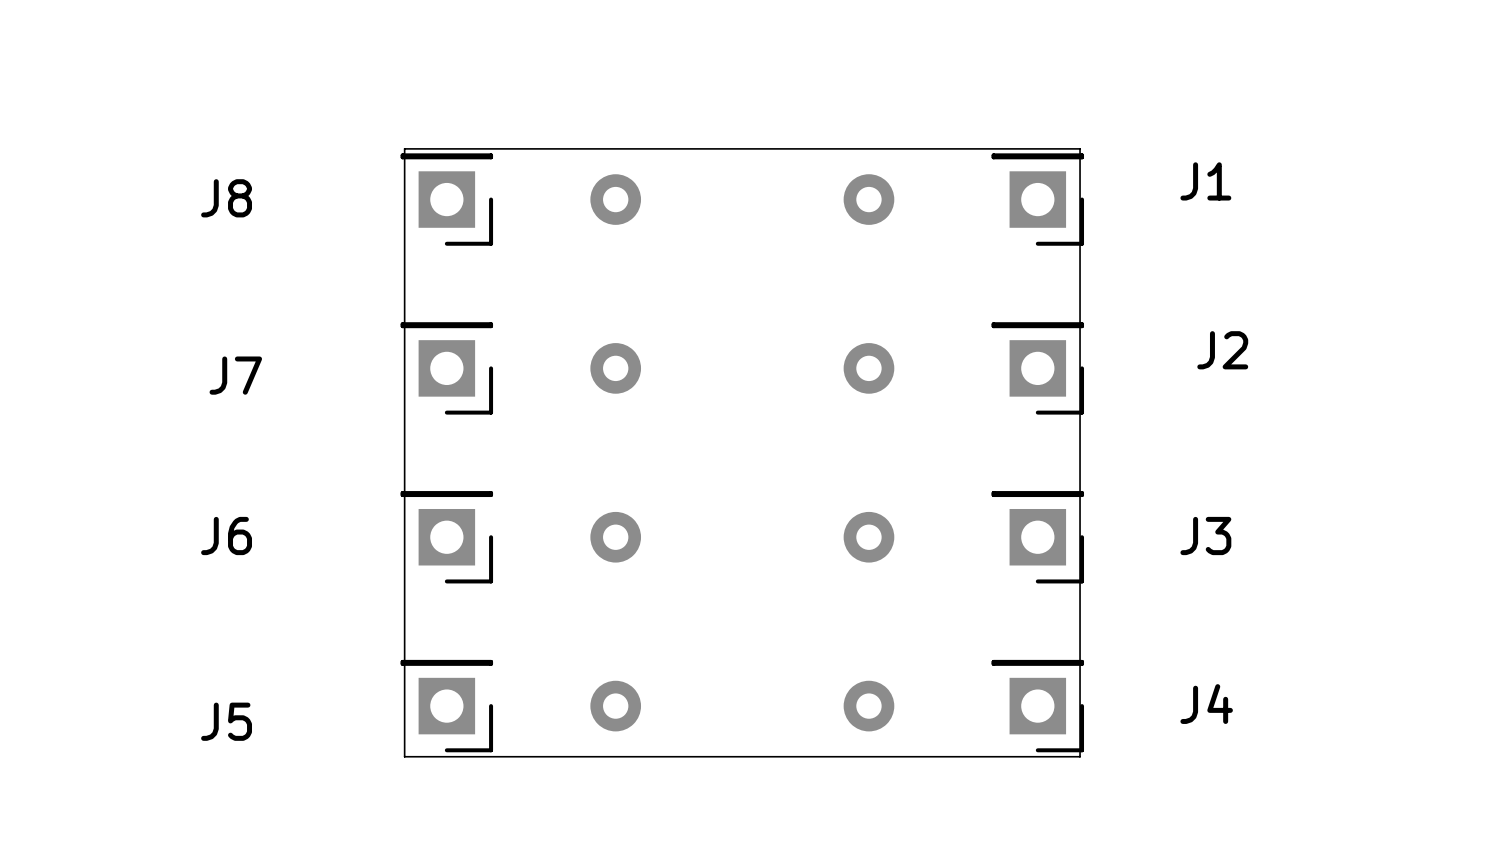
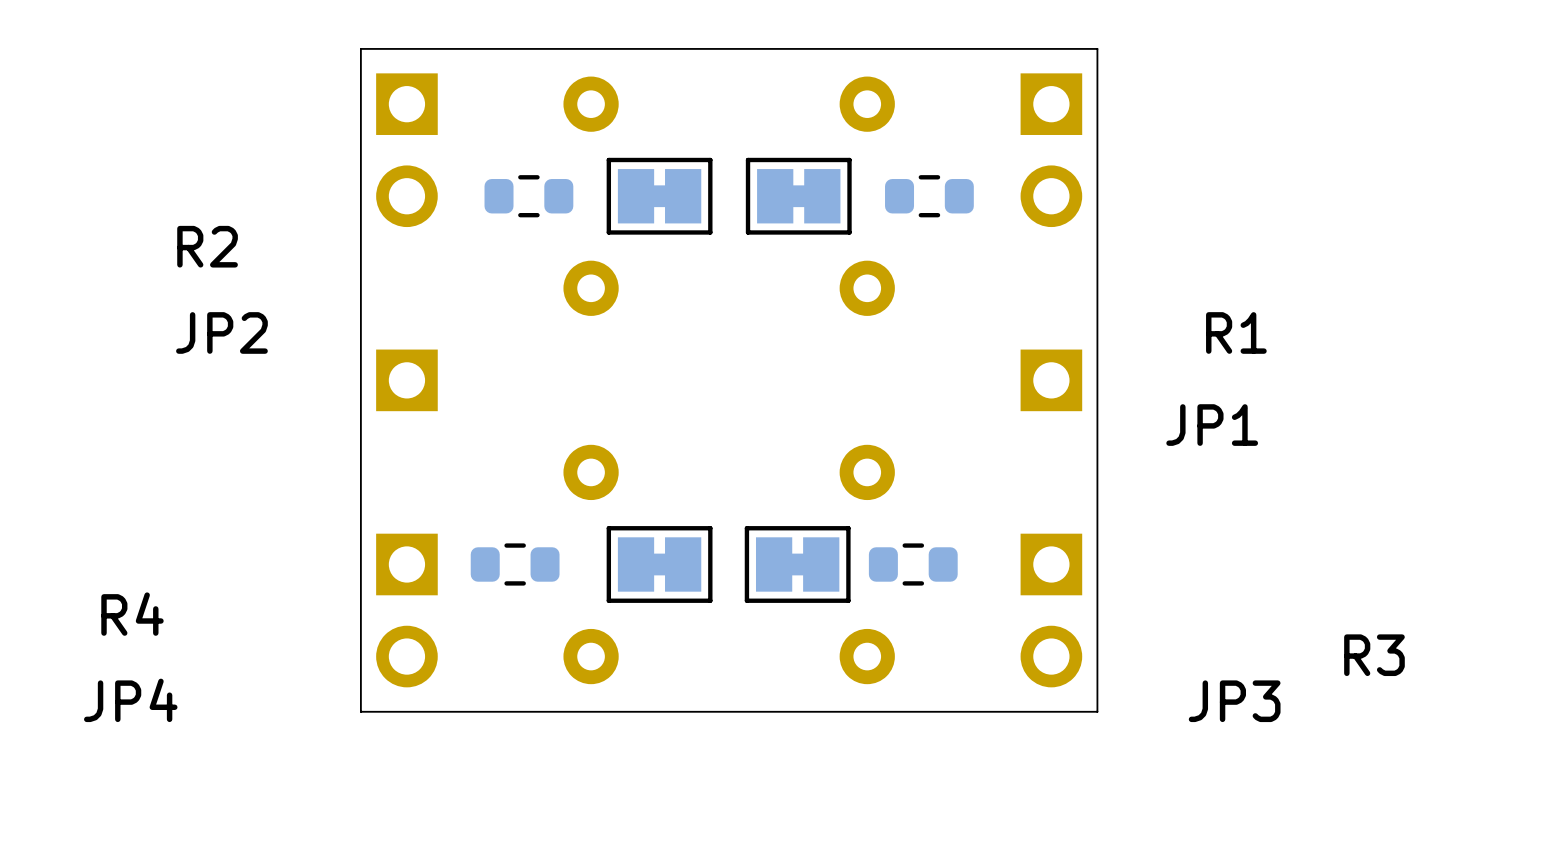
J8: (446, 199) -> none
J1: (1037, 199) -> none
part: none -> (406, 150)
part: none -> (1051, 150)
R2: none -> (528, 196)
JP2: none -> (659, 196)
JP1: none -> (798, 196)
R1: none -> (929, 196)
J7: (446, 368) -> none
J2: (1037, 368) -> none
part: none -> (406, 380)
part: none -> (1051, 380)
J6: (446, 537) -> none
J3: (1037, 537) -> none
R4: none -> (515, 564)
JP4: none -> (659, 564)
JP3: none -> (797, 564)
R3: none -> (913, 564)
part: none -> (406, 610)
part: none -> (1051, 610)
J5: (446, 706) -> none
J4: (1037, 706) -> none

